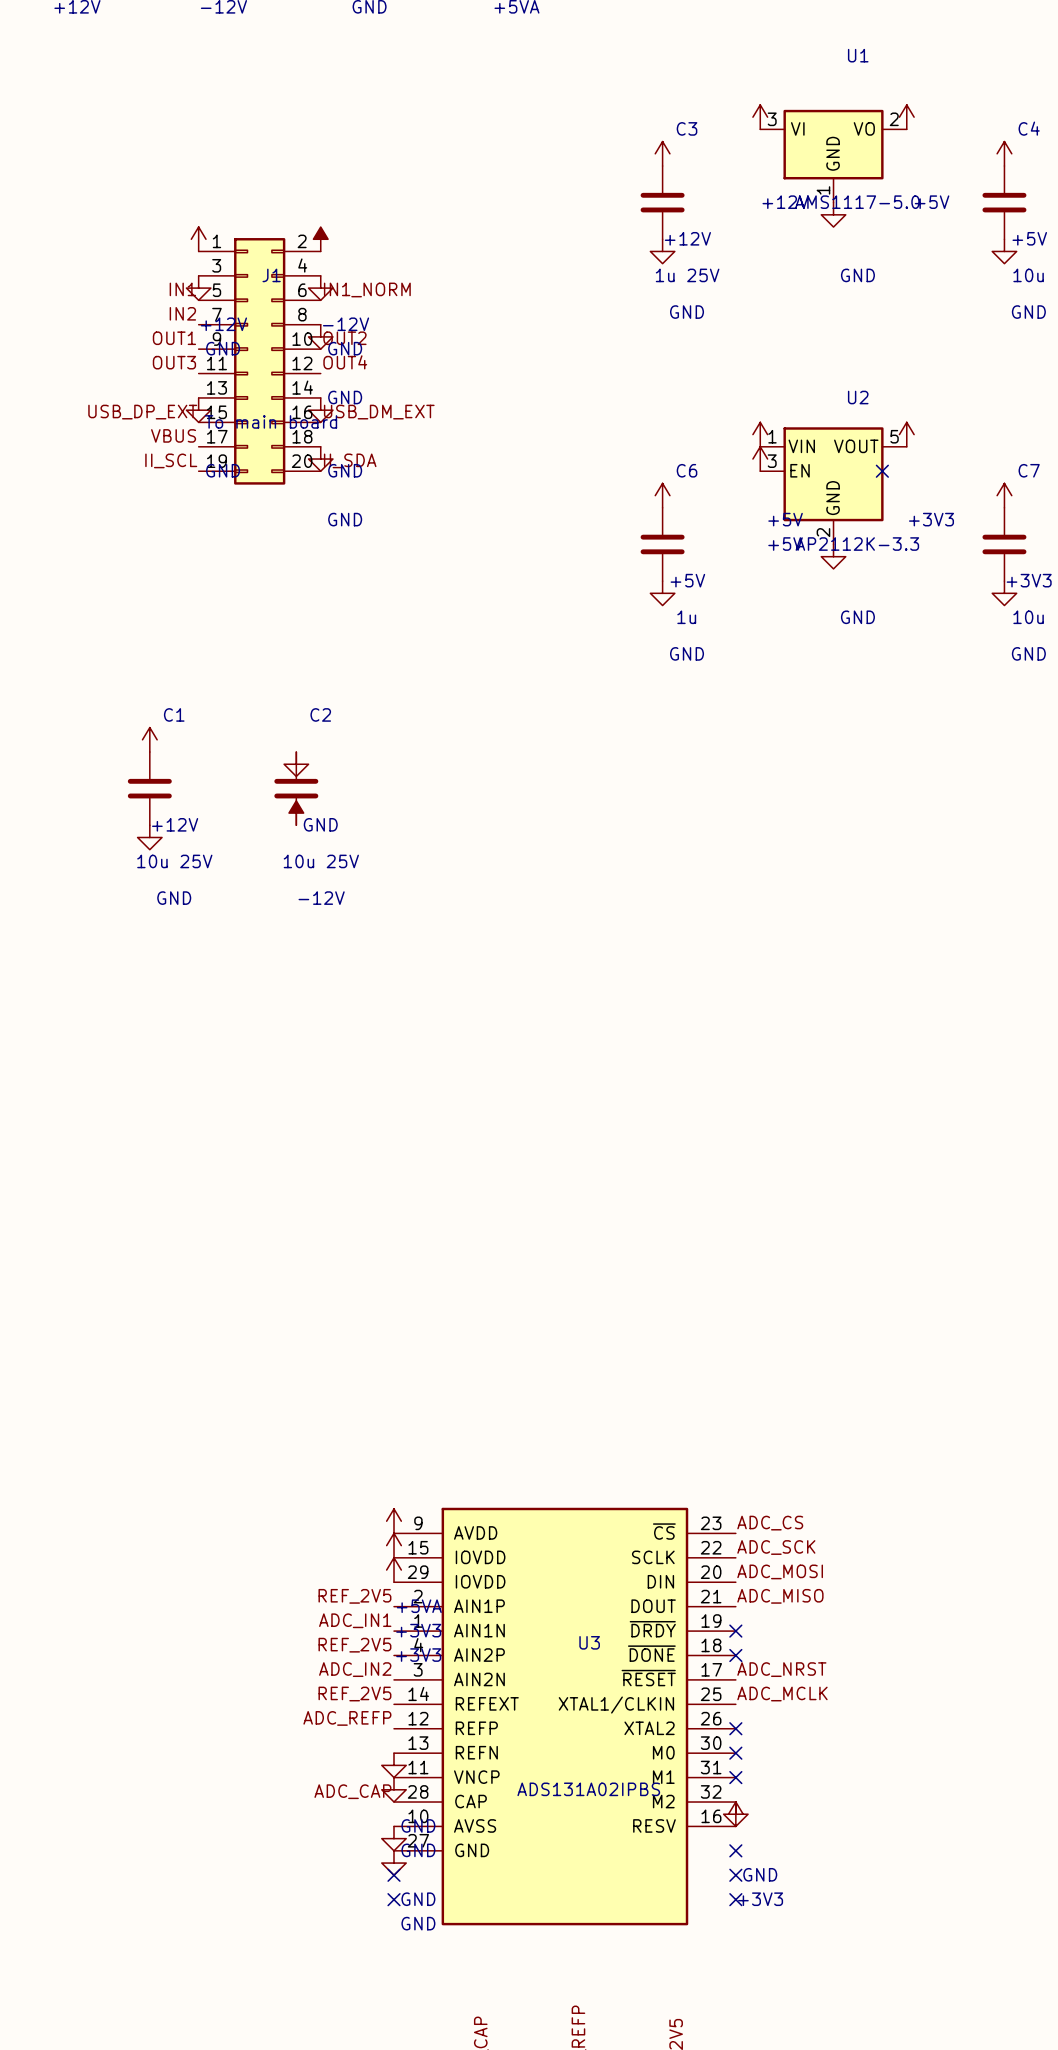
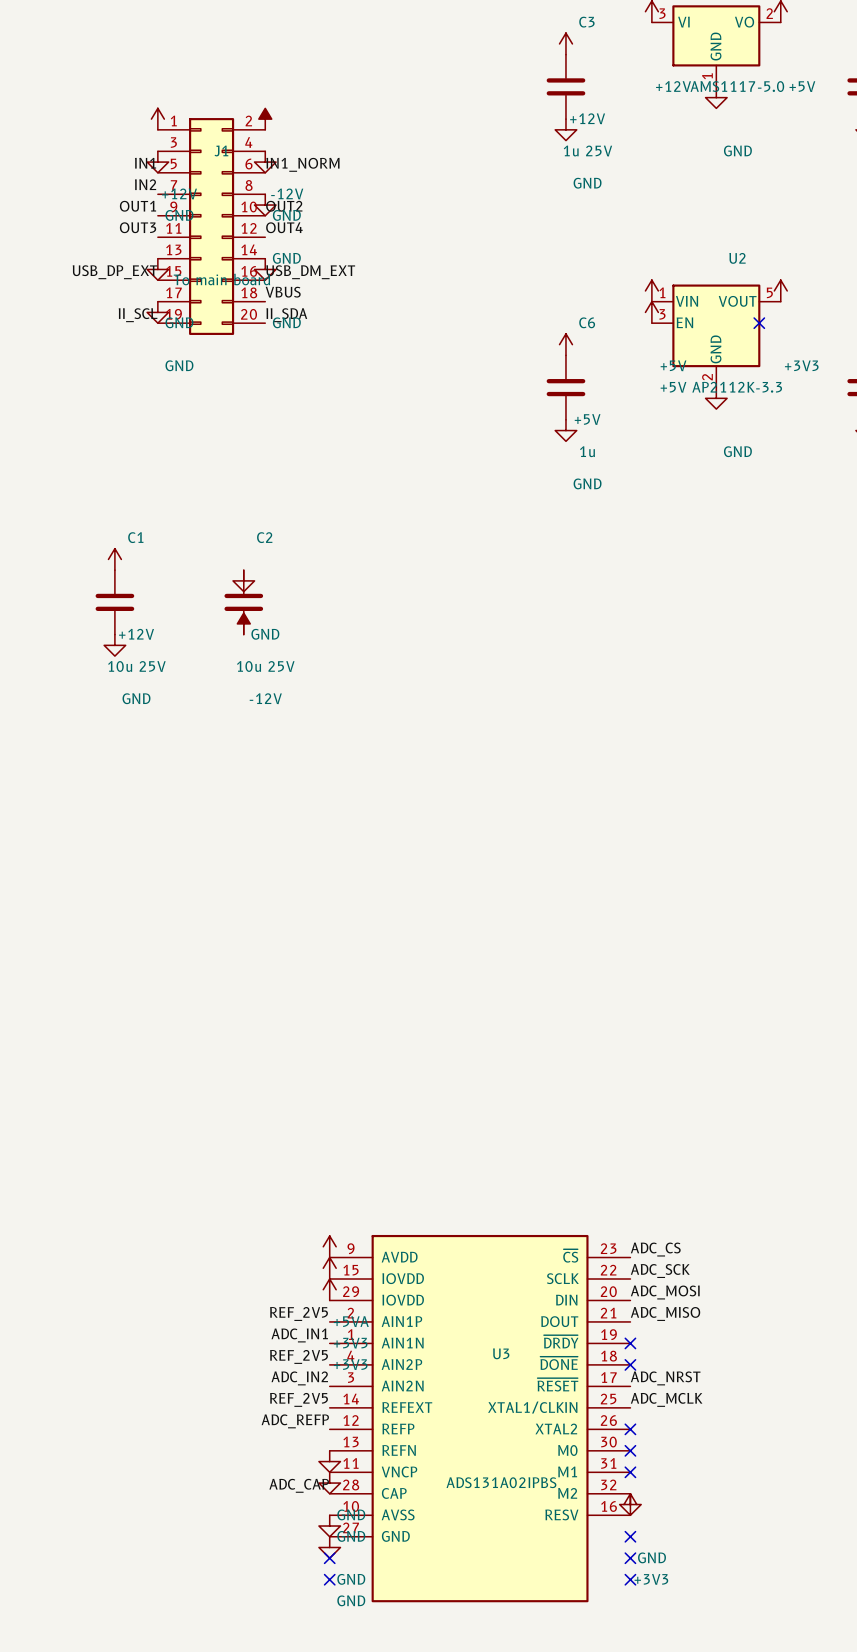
label position: VBUS (173, 435) -> VBUS (283, 292)
power symbol position: GND (320, 459) -> GND (157, 312)

